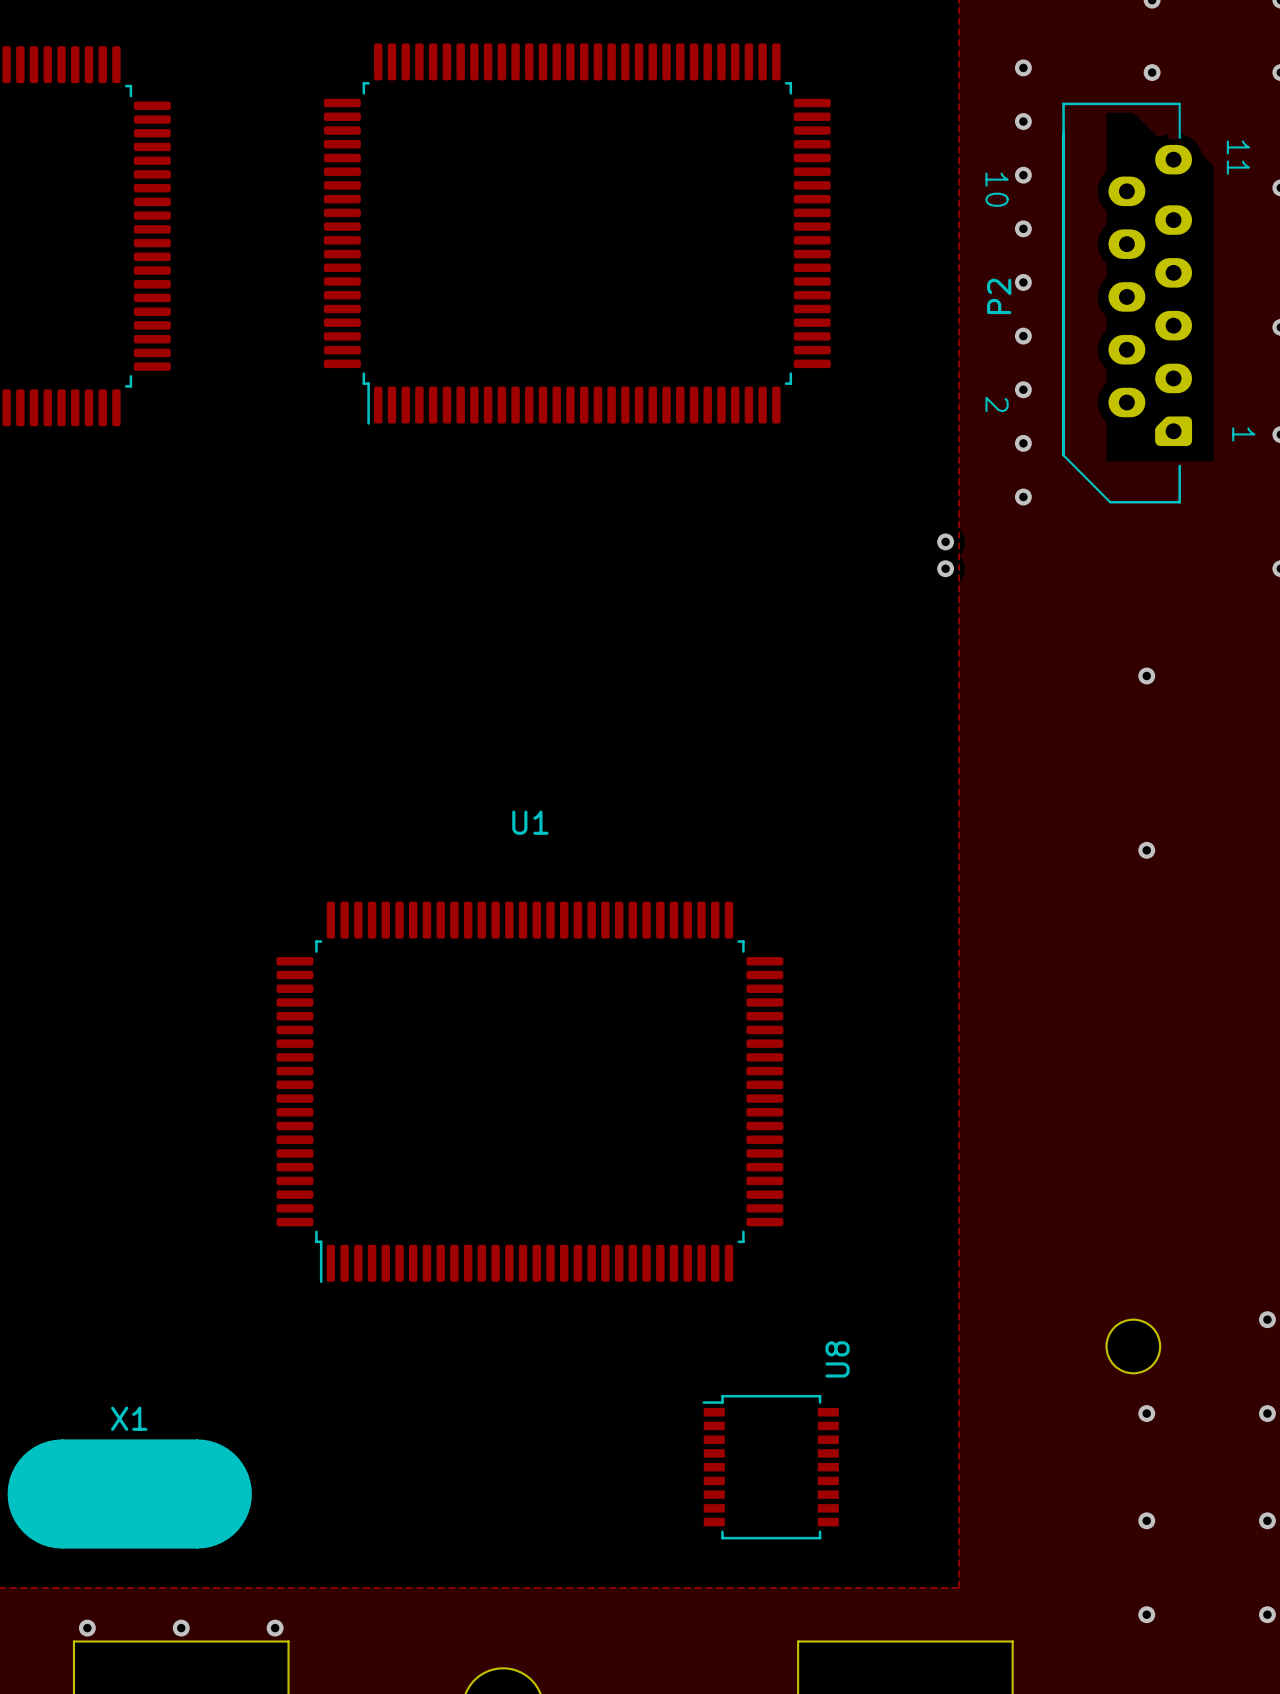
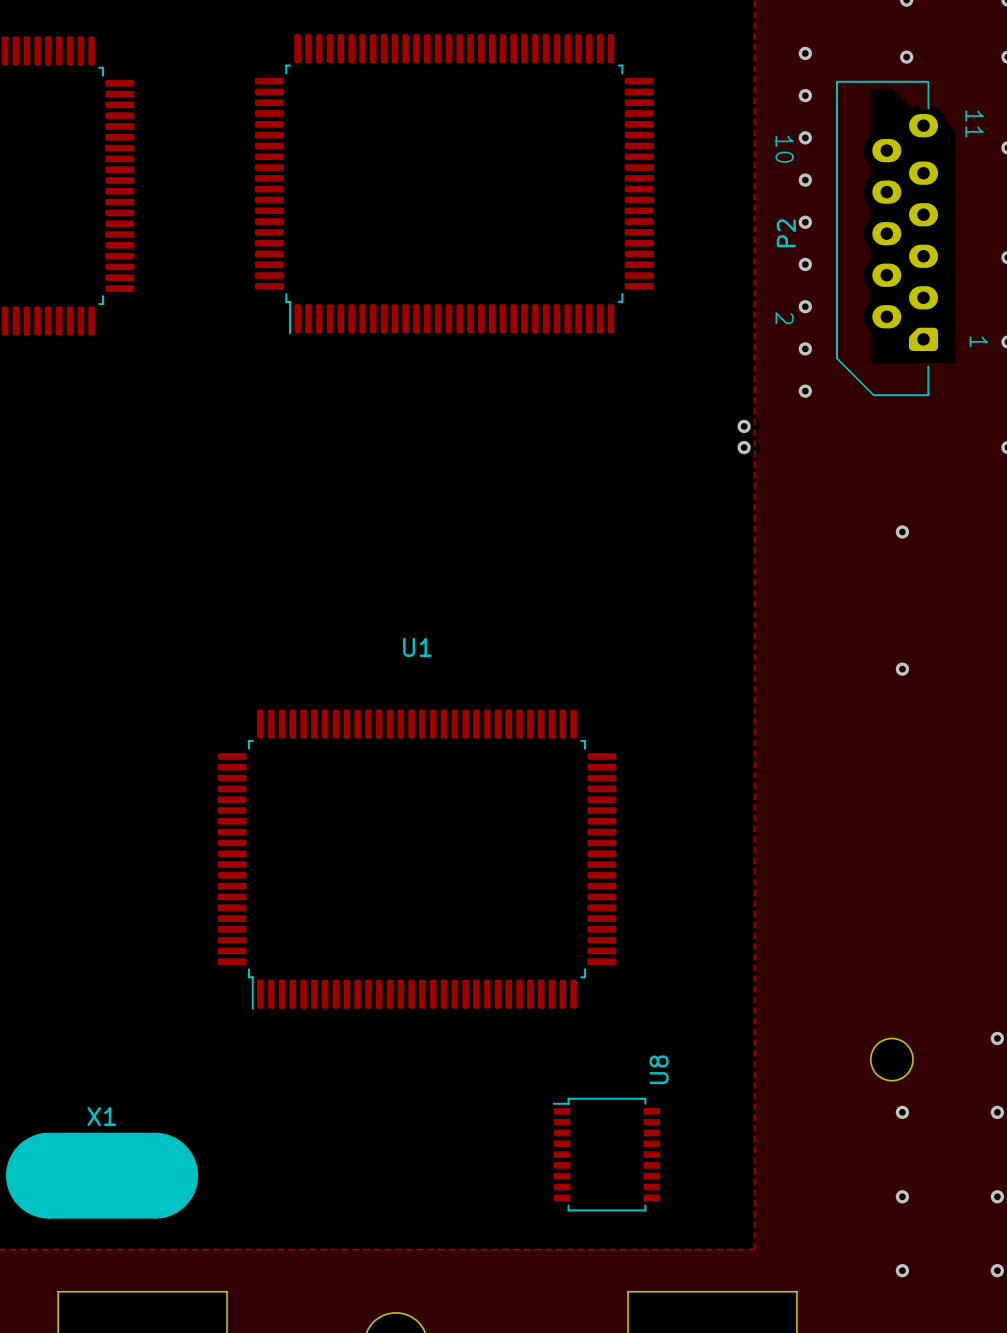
via: (87, 1628) -> none
via: (181, 1628) -> none
via: (275, 1628) -> none

